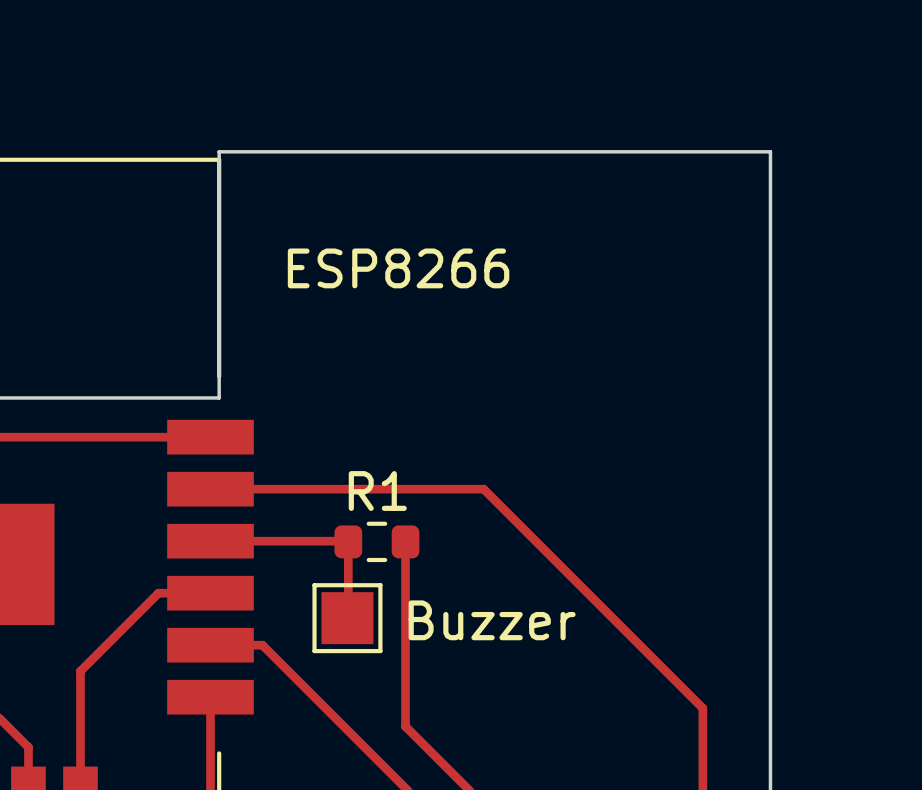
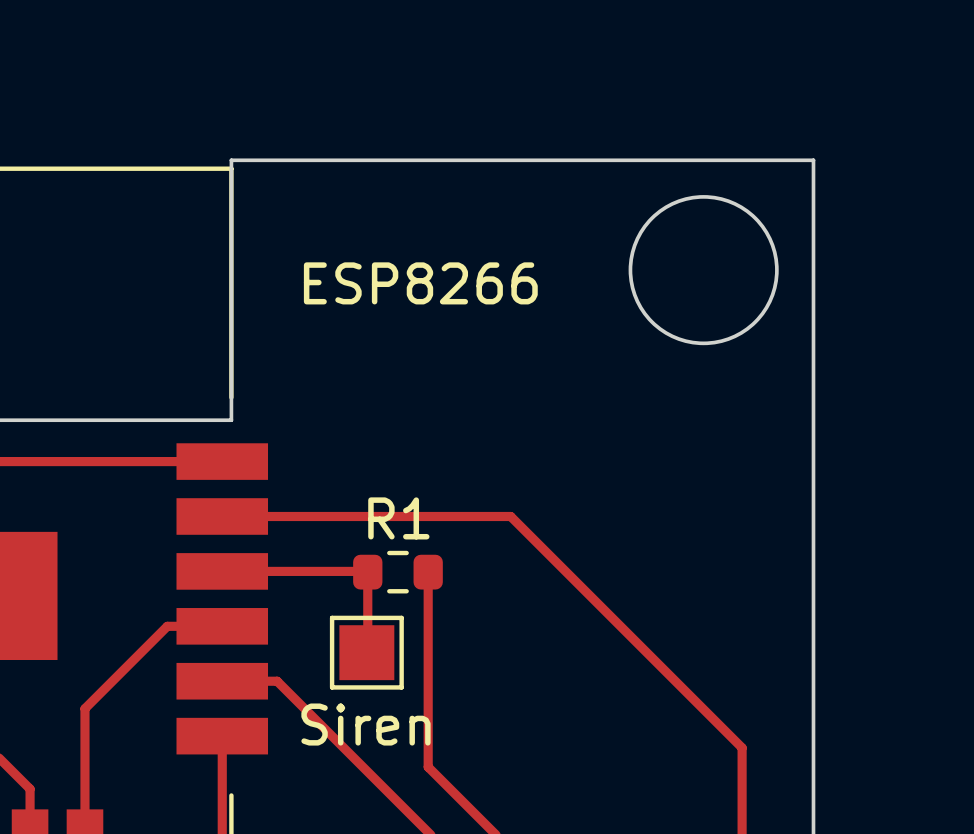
round board edge: none -> [628, 195, 779, 346]
Buzzer name: Buzzer (492, 620) -> Siren (365, 724)

